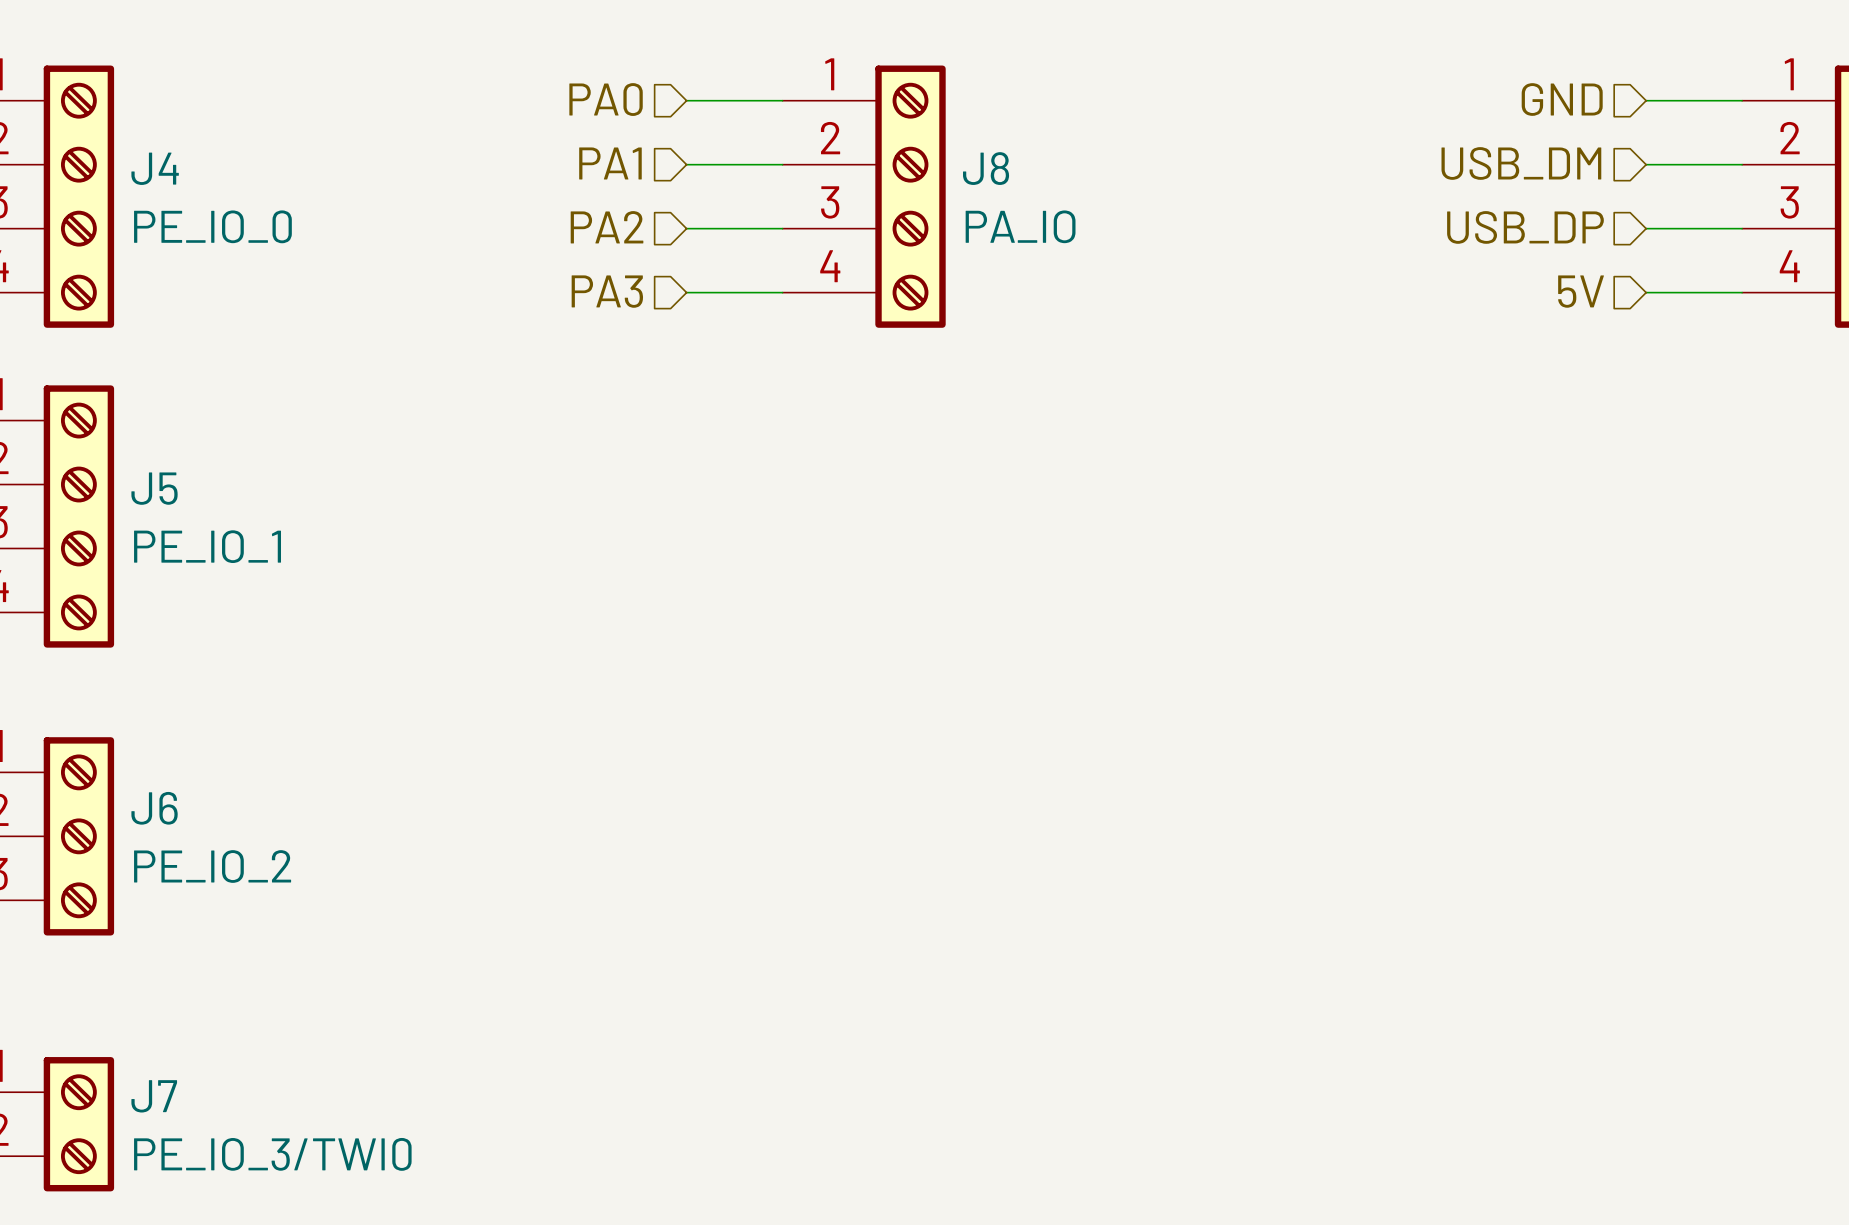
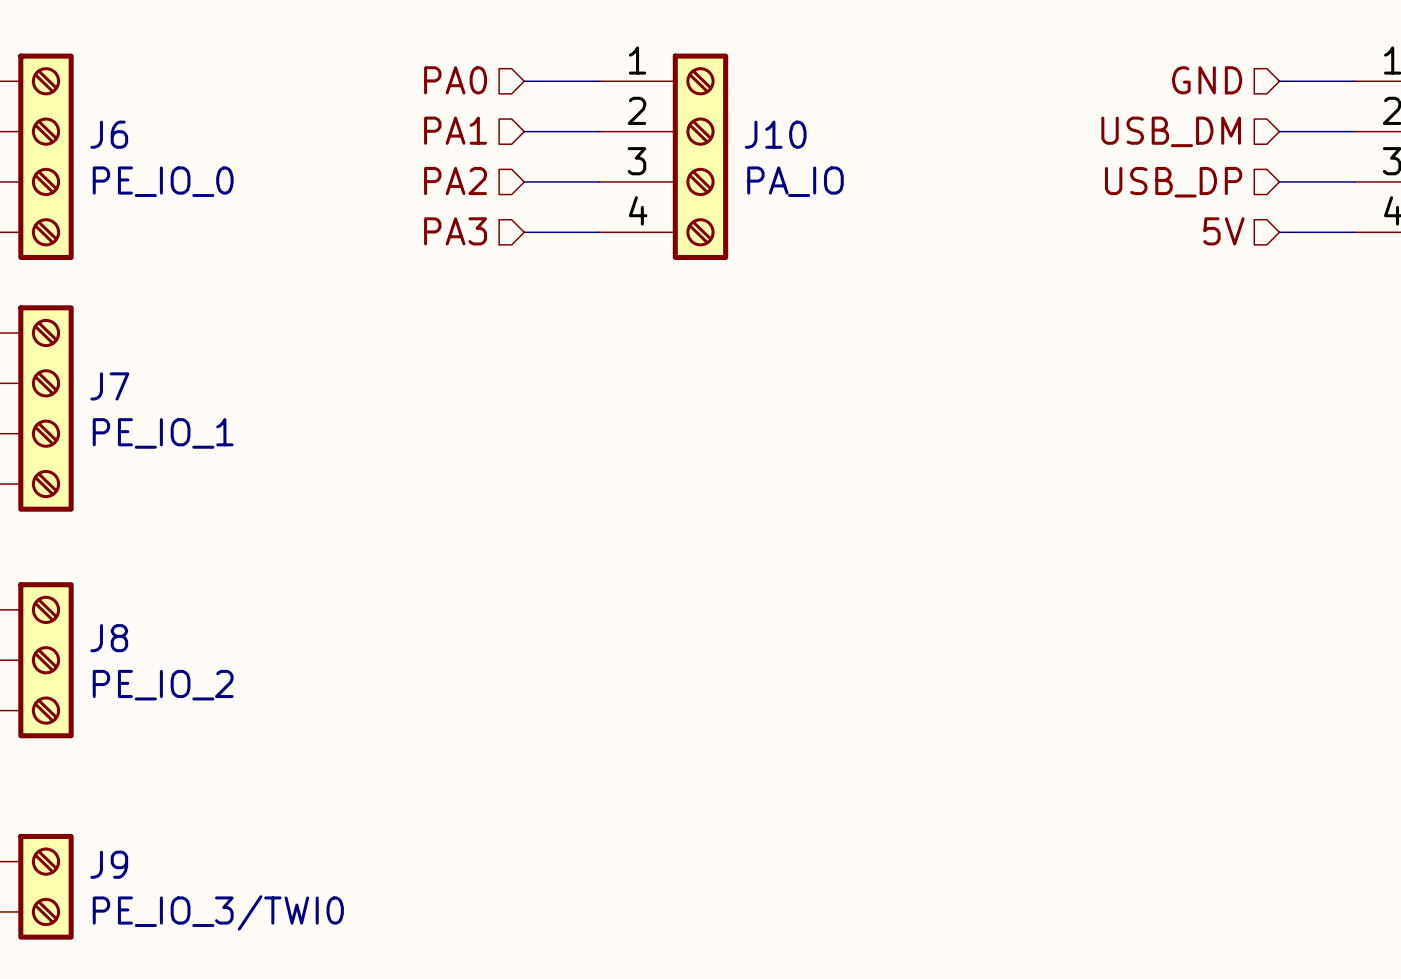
J4 name: J4 (155, 168) -> J6 (109, 134)
J8 name: J8 (986, 168) -> J10 (775, 134)
J5 name: J5 (154, 488) -> J7 (109, 386)
J6 name: J6 (154, 808) -> J8 (109, 638)
J7 name: J7 (154, 1096) -> J9 (109, 864)

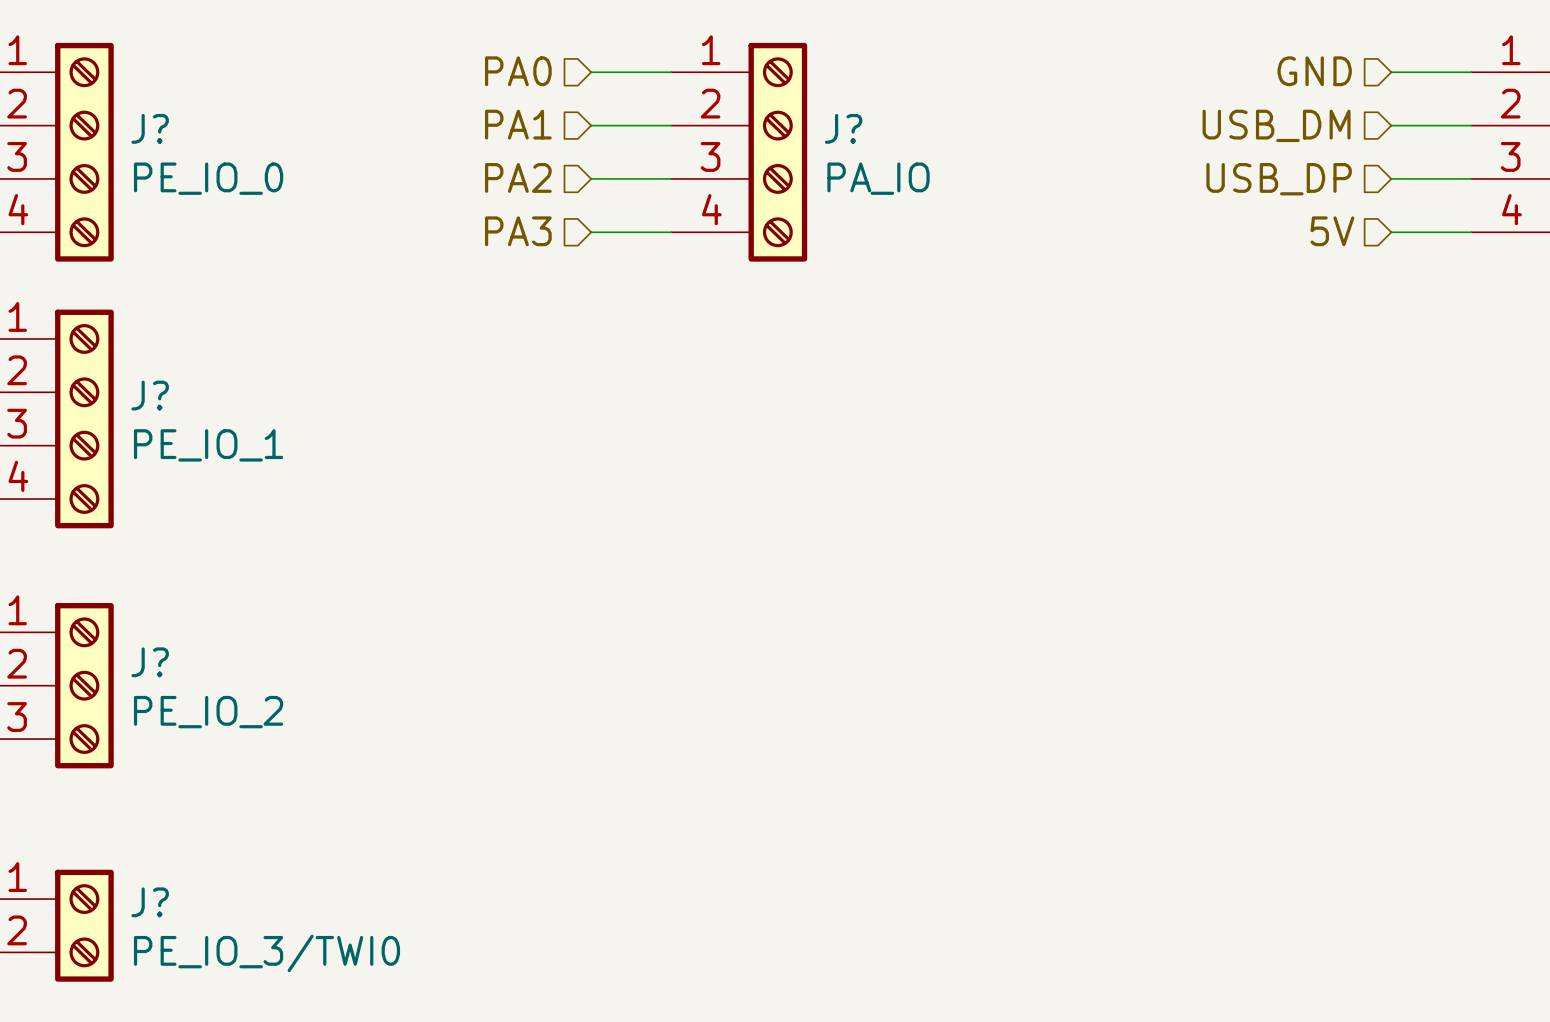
J6 name: J6 (109, 134) -> J? (150, 128)
J10 name: J10 (775, 134) -> J? (843, 128)
J7 name: J7 (109, 386) -> J? (150, 395)
J8 name: J8 (109, 638) -> J? (150, 662)
J9 name: J9 (109, 864) -> J? (150, 902)

